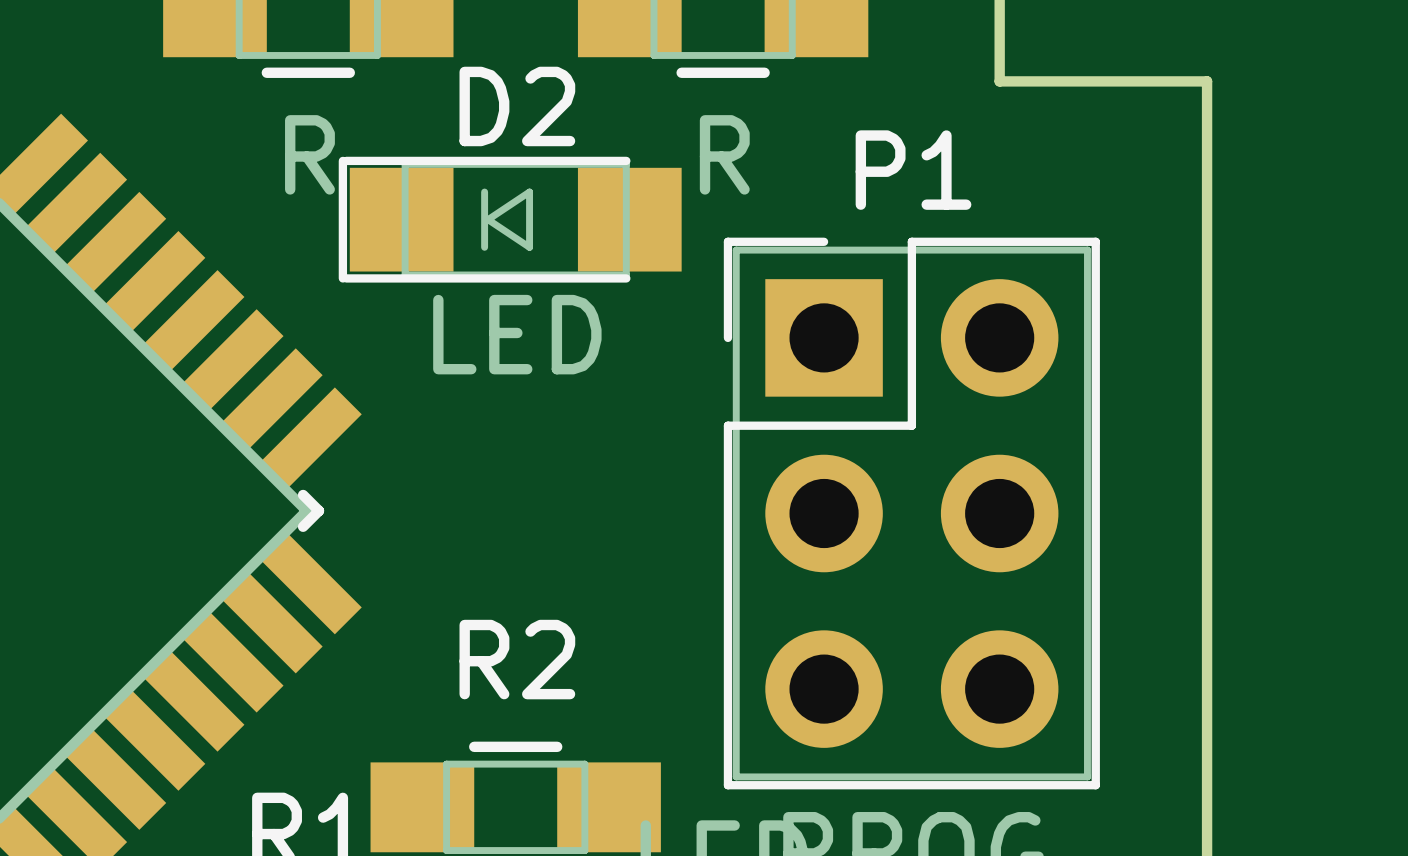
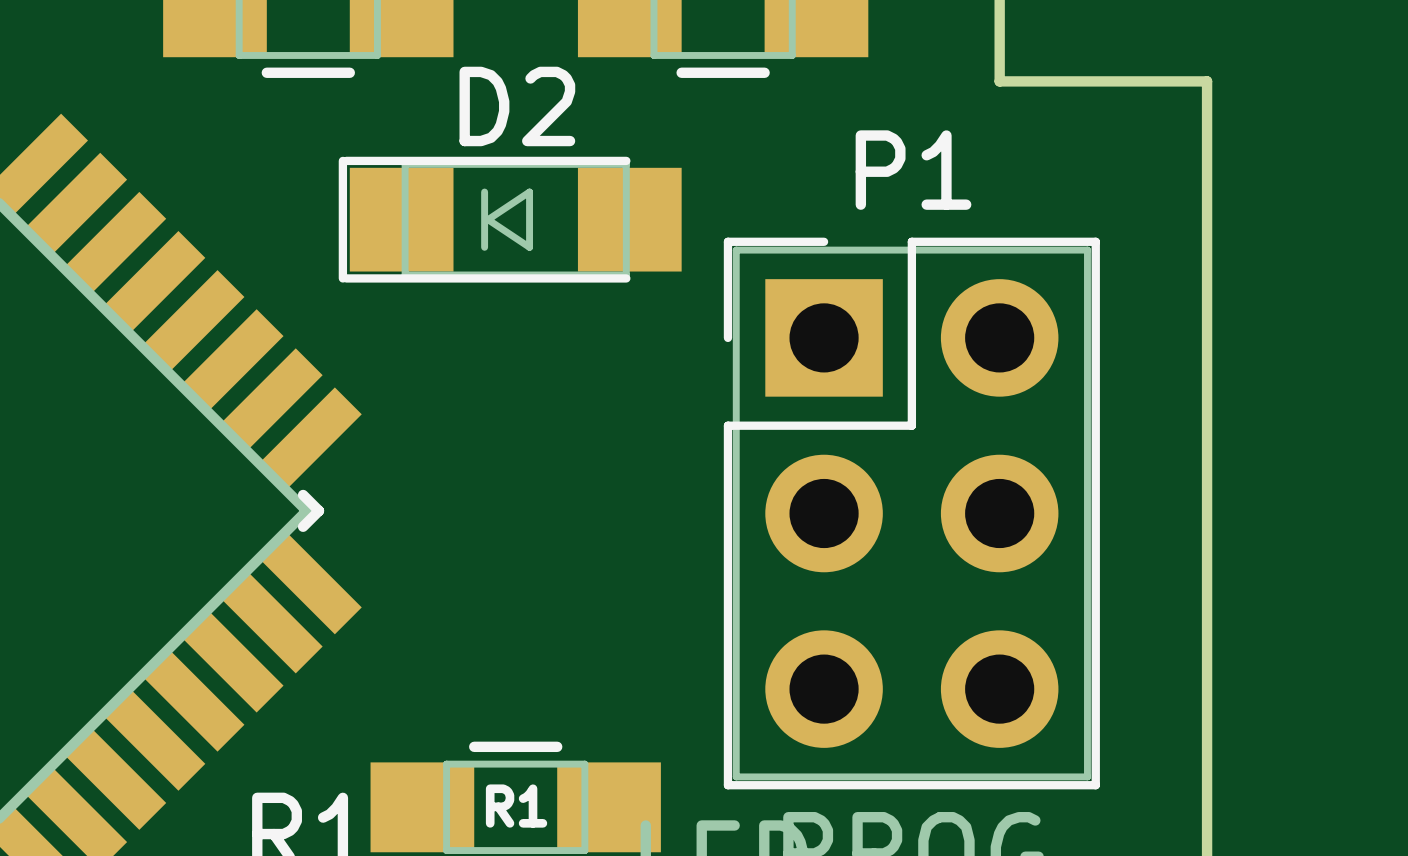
part value: R (309, 154) -> none
part value: R (724, 154) -> none
D2 value: LED (517, 334) -> none
R2 name: R2 (517, 659) -> R1 (516, 806)

